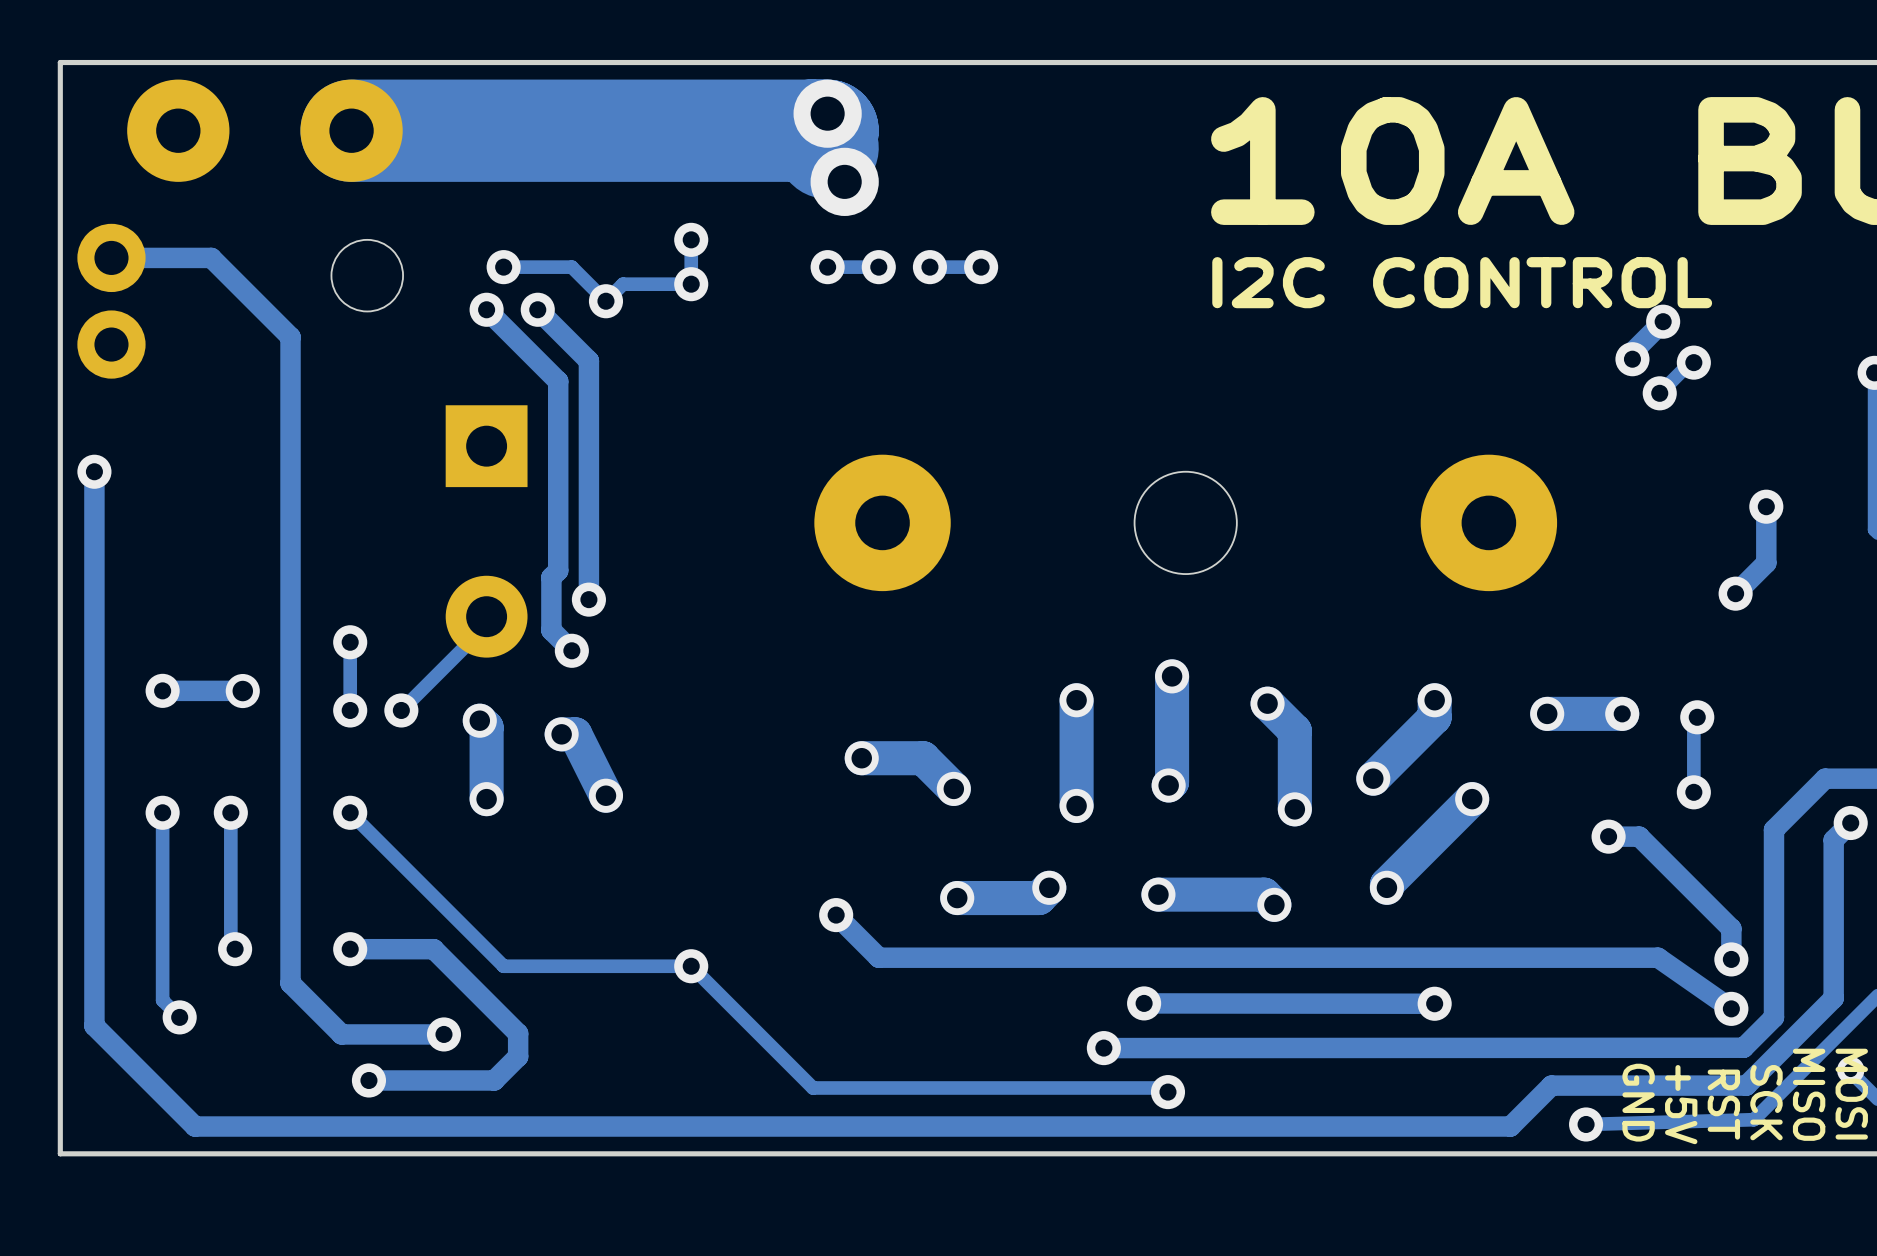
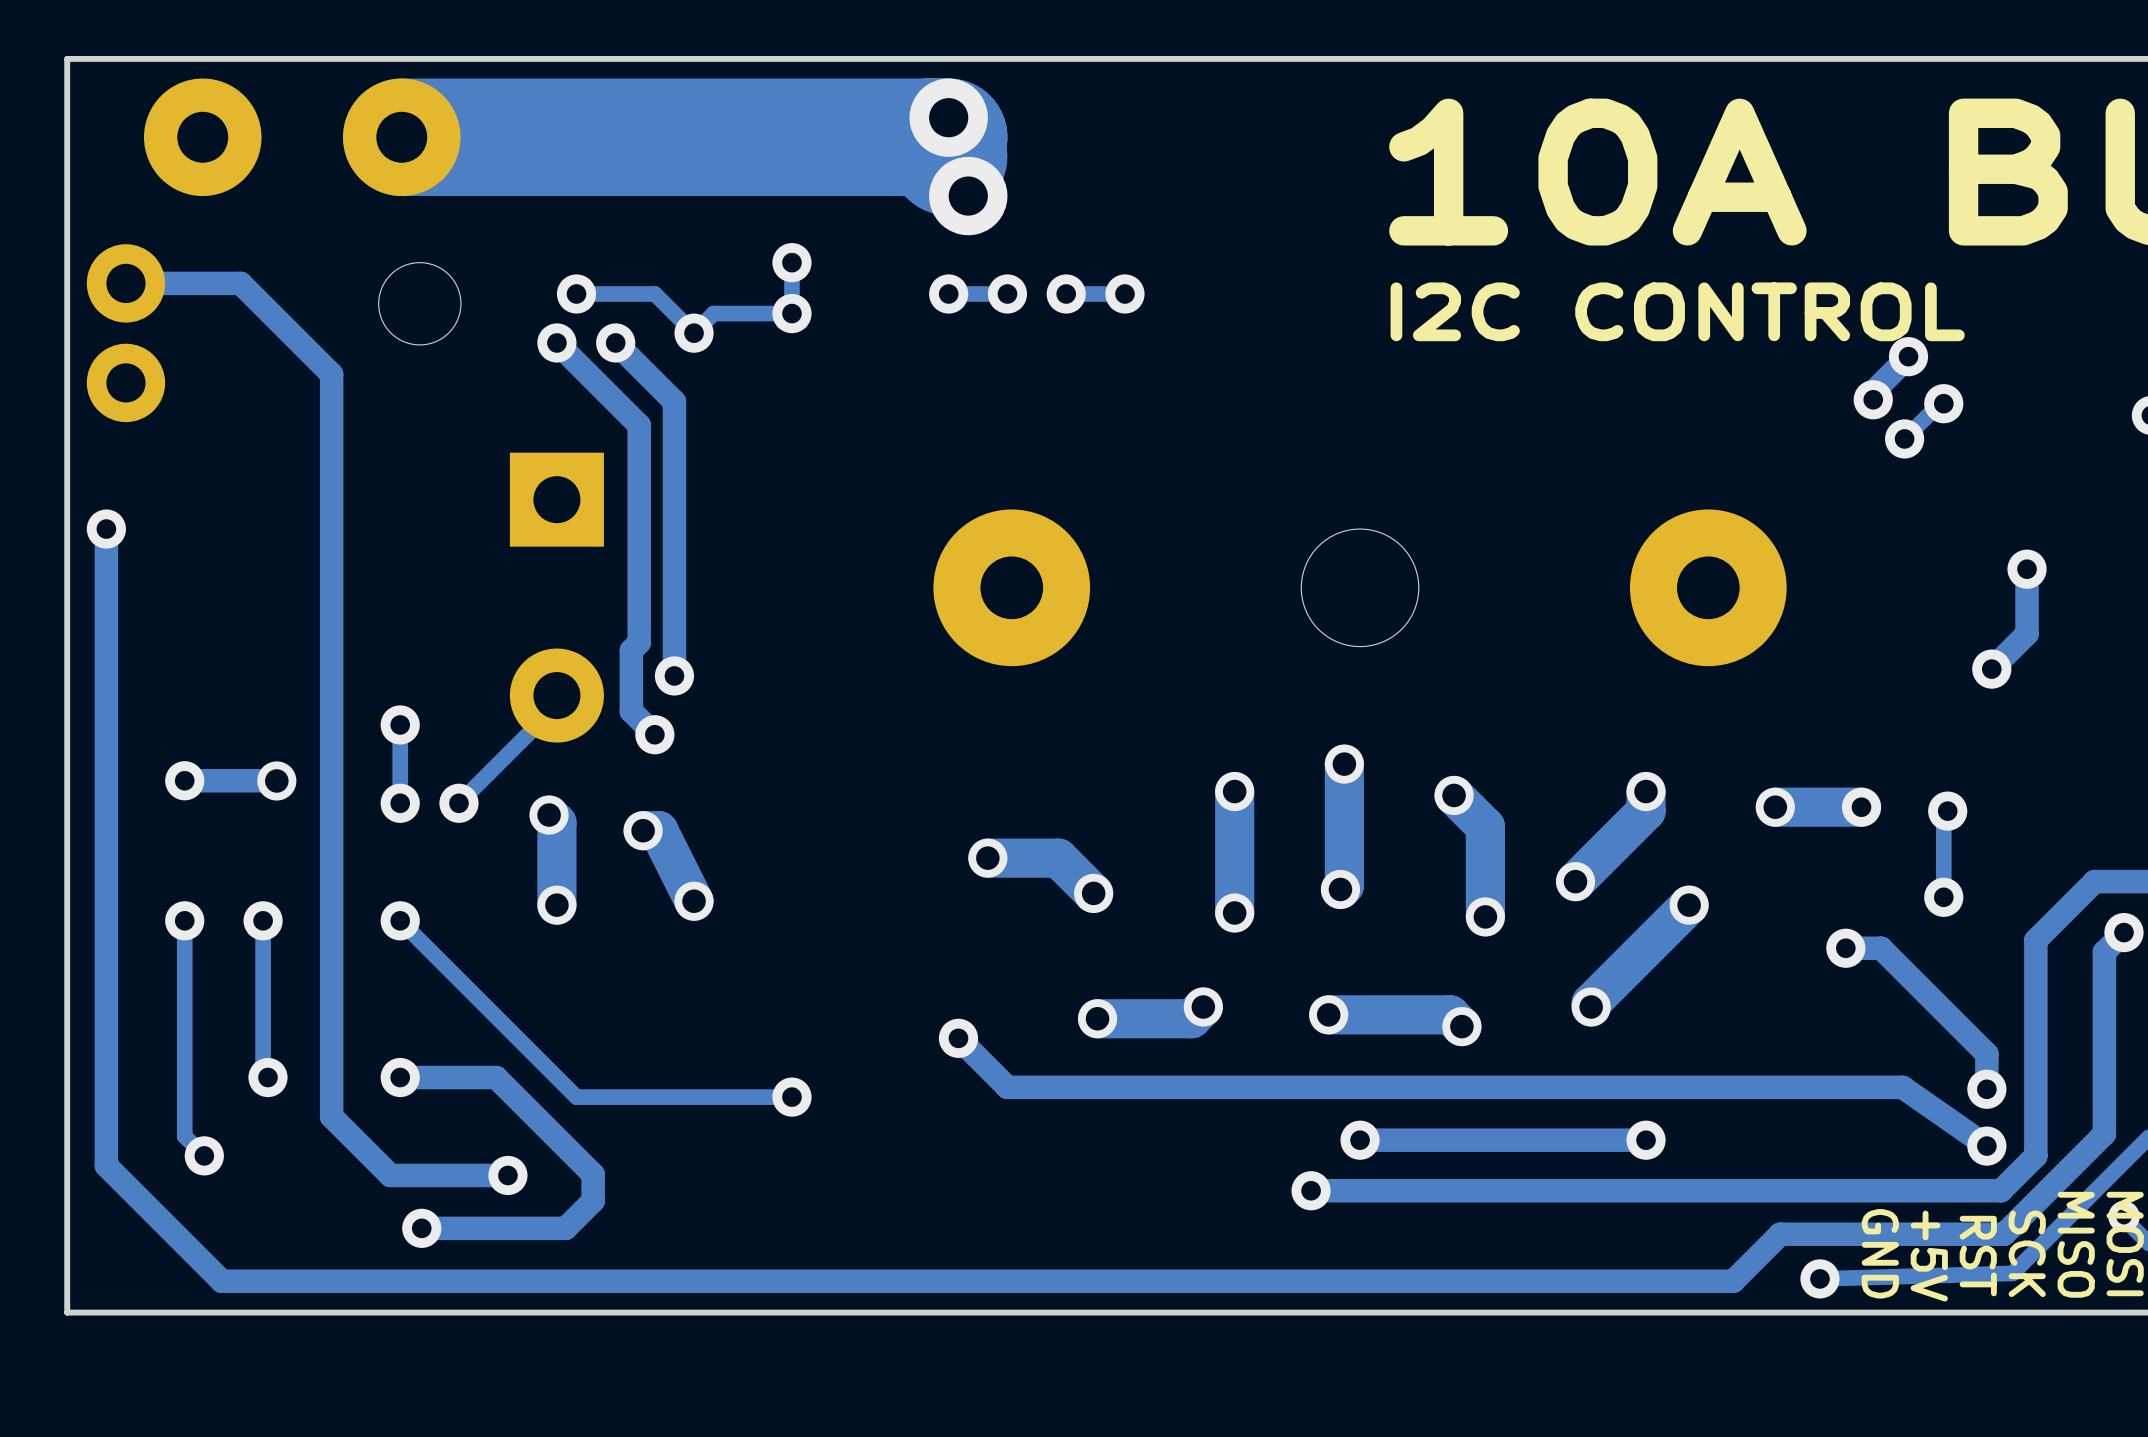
track: (691, 966) (812, 1087) (1163, 1087) (1167, 1092) -> none
via: (1144, 1003) -> none
via: none -> (1360, 1140)
track: (1434, 1003) (1144, 1003) (1147, 1006) -> (1646, 1140) (1360, 1140) (1363, 1144)
via: none -> (1311, 1190)
track: (1743, 1047) (1103, 1048) -> (2000, 1190) (1311, 1190)
via: (1103, 1048) -> none
via: (1167, 1092) -> none

